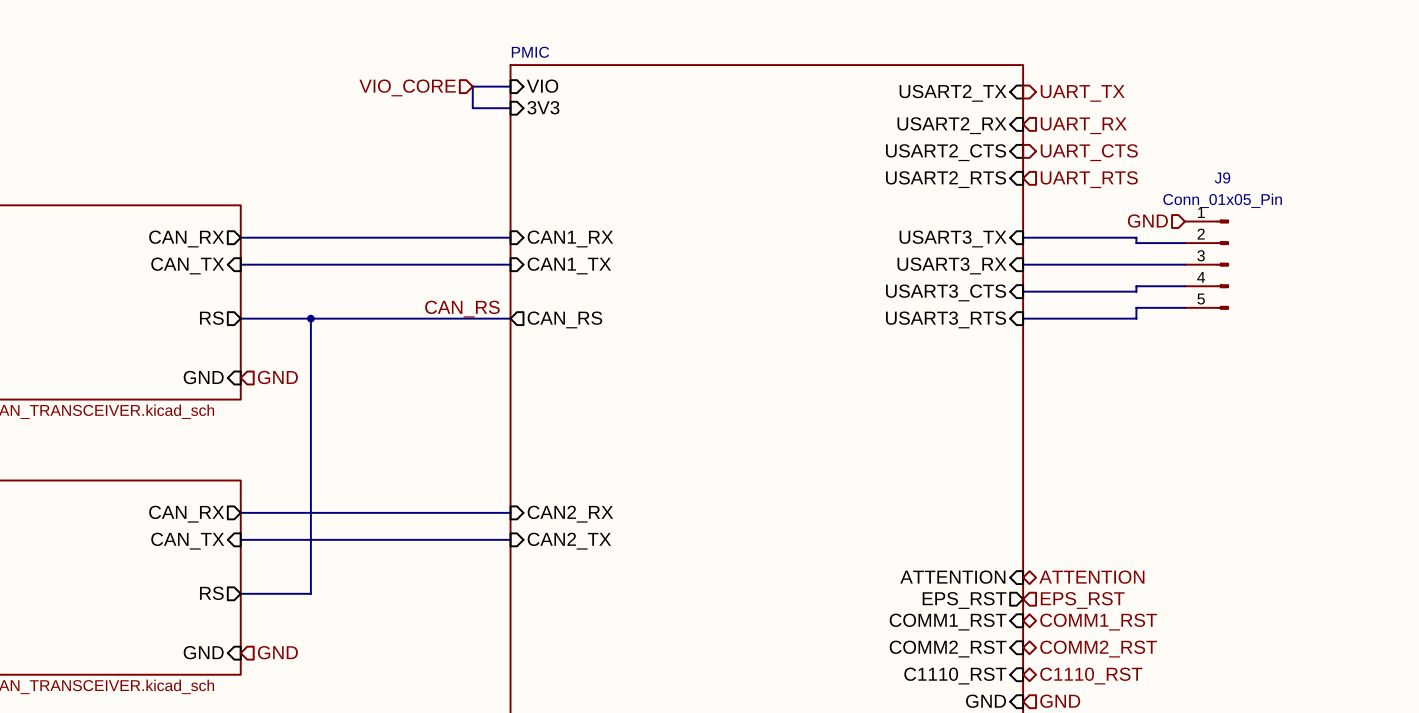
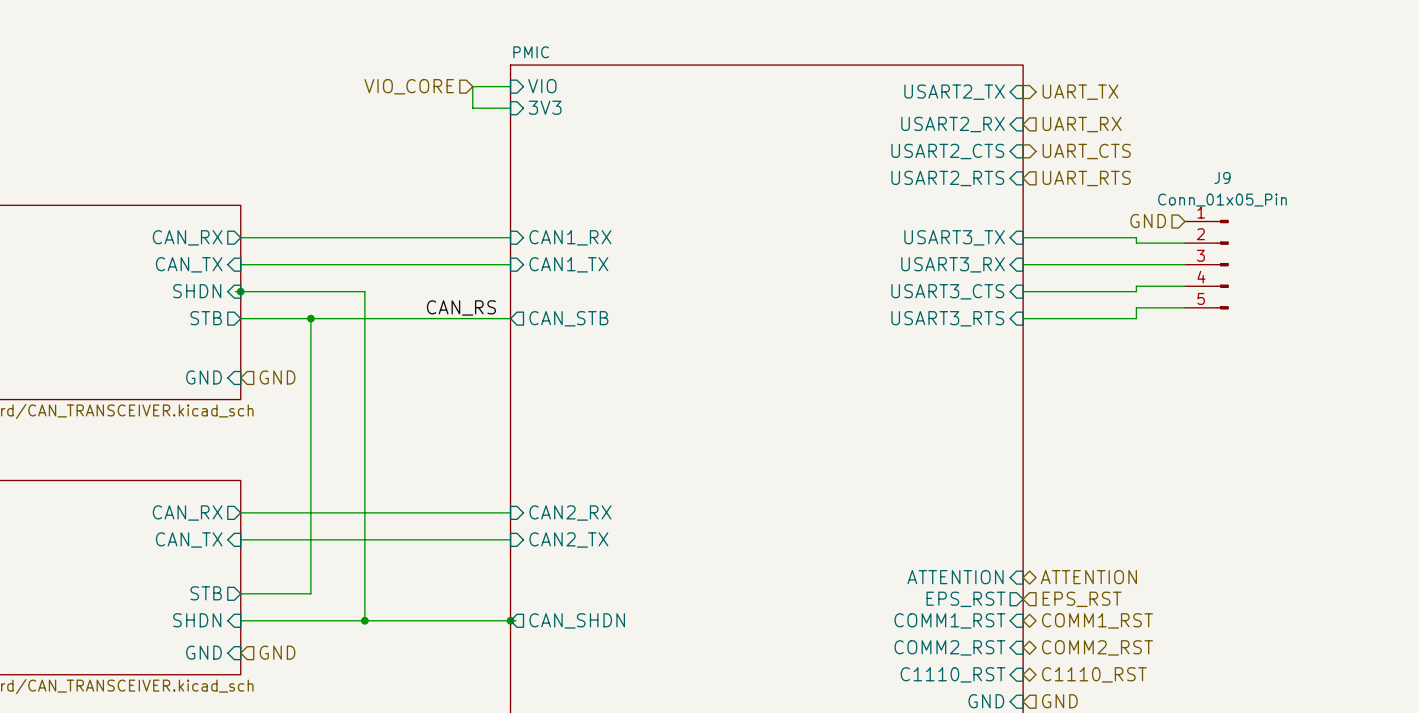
sheet pin: none -> SHDN (197, 291)
wire: none -> (235, 291) (364, 291) (364, 620)
junction: none -> (240, 291)
sheet pin: RS (211, 318) -> STB (206, 318)
sheet pin: CAN_RS (564, 319) -> CAN_STB (568, 318)
sheet pin: RS (211, 593) -> STB (206, 593)
sheet pin: none -> SHDN (197, 620)
wire: none -> (240, 620) (515, 620)
junction: none -> (364, 620)
junction: none -> (510, 620)
sheet pin: none -> CAN_SHDN (577, 620)

